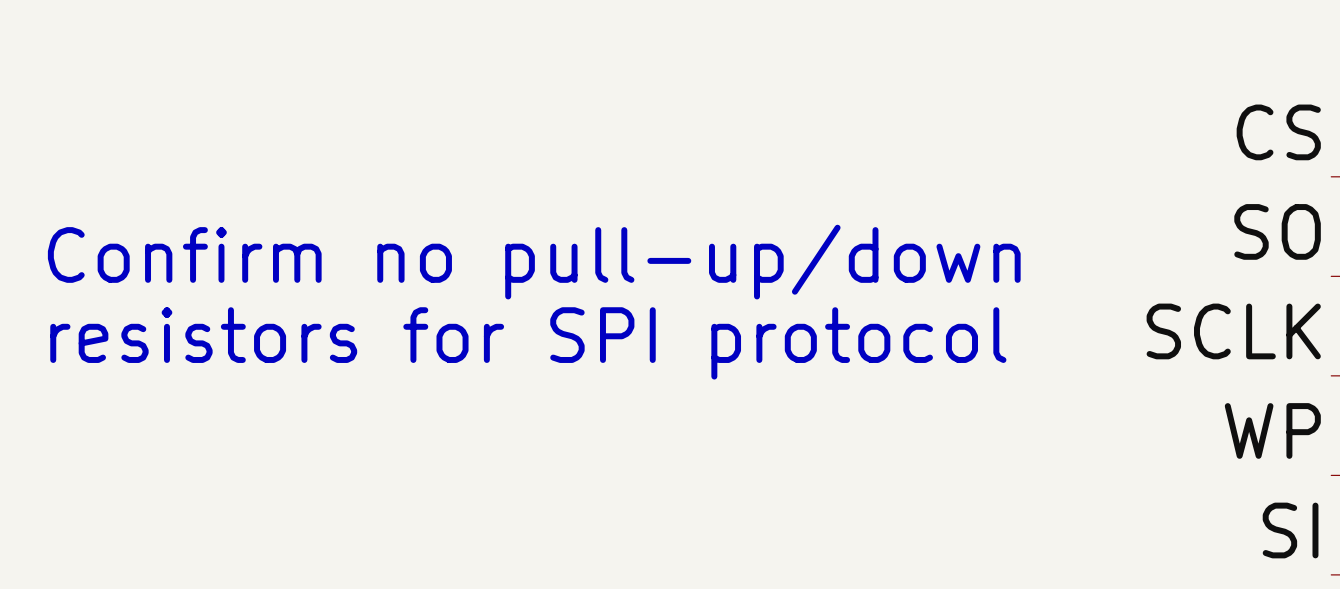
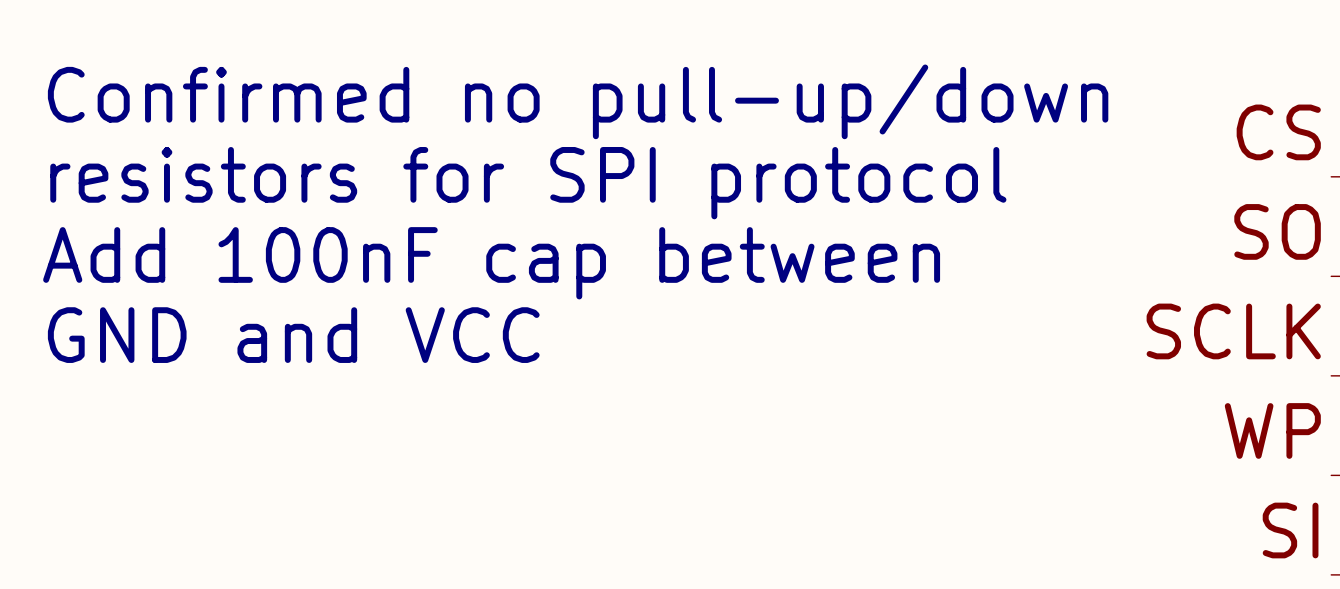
text: none -> Confirmed no pull-up/down (578, 101)
text: none -> resistors for SPI protocol (528, 183)
text: Confirm no pull-up/down (534, 262) -> Add 100nF cap between (491, 263)
text: resistors for SPI protocol (528, 343) -> GND and VCC (293, 335)

